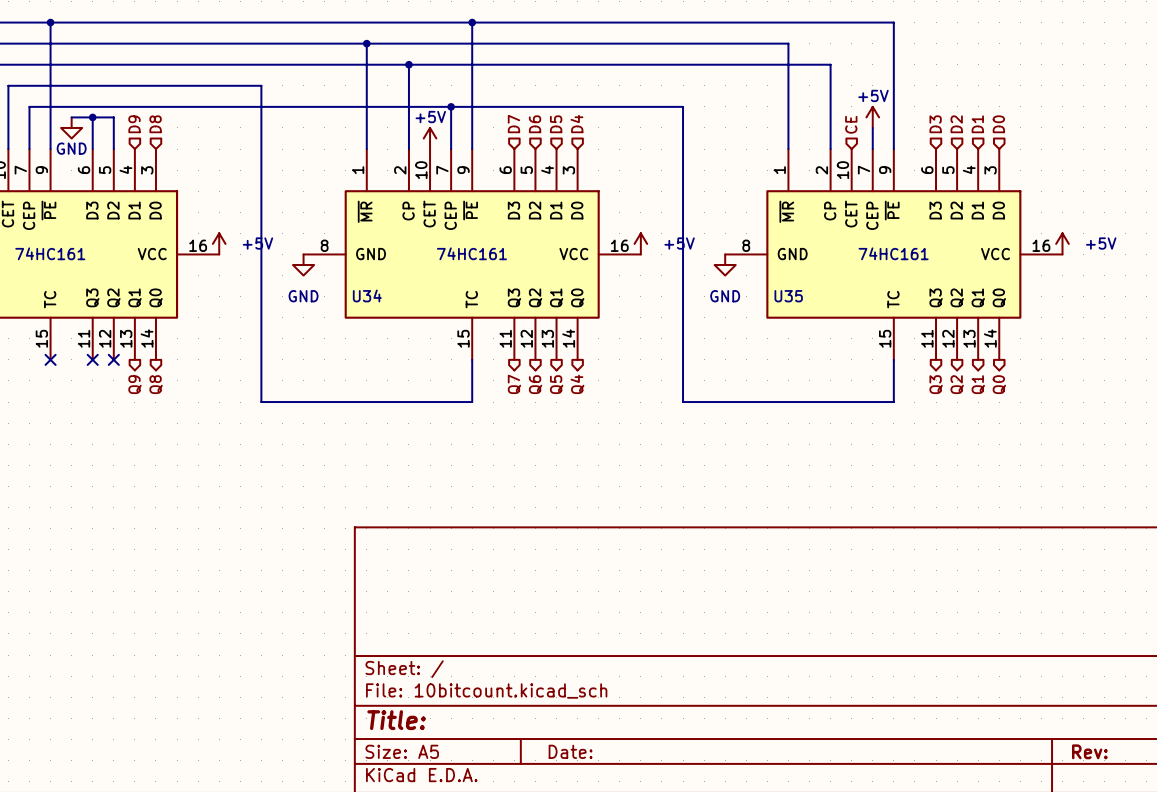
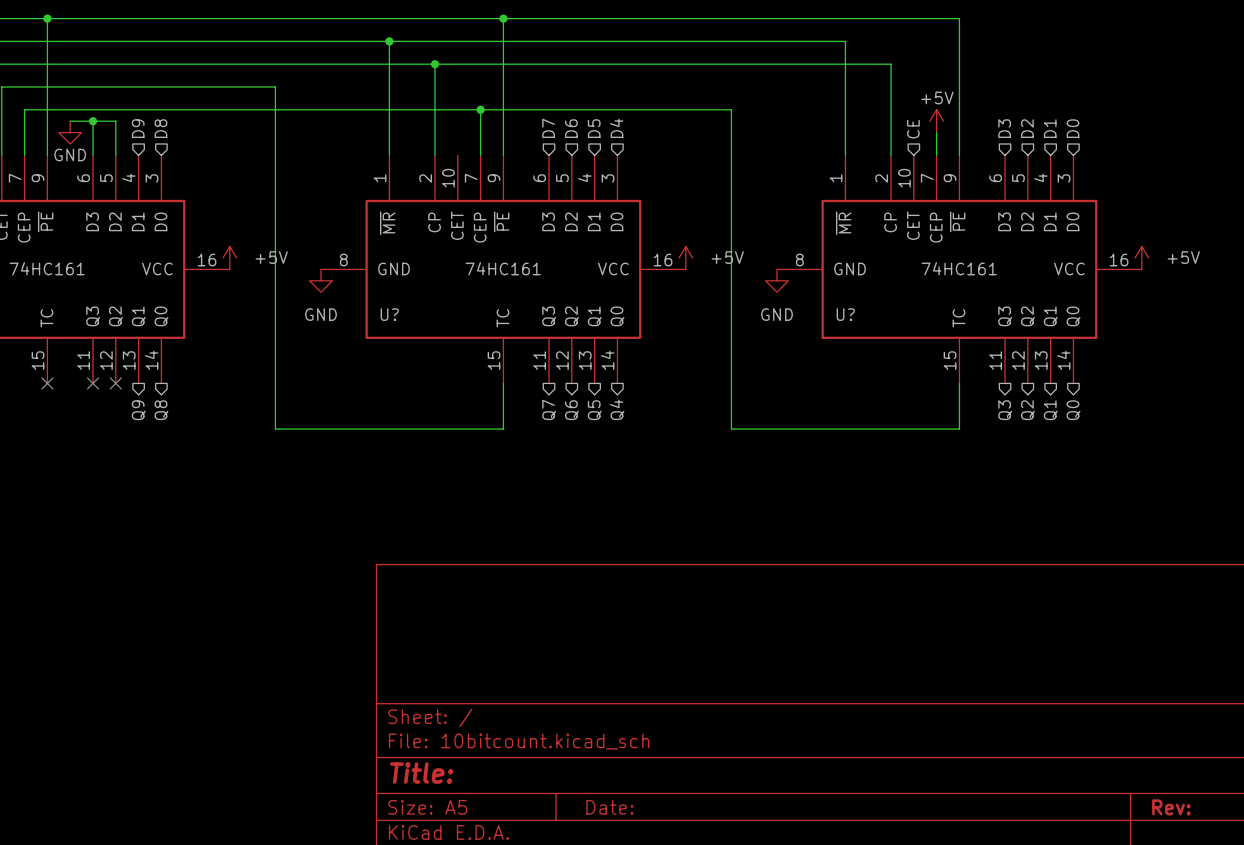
power symbol: +5V (430, 138) -> none
U34 name: U34 (367, 295) -> U? (389, 314)
U35 name: U35 (788, 296) -> U? (845, 314)

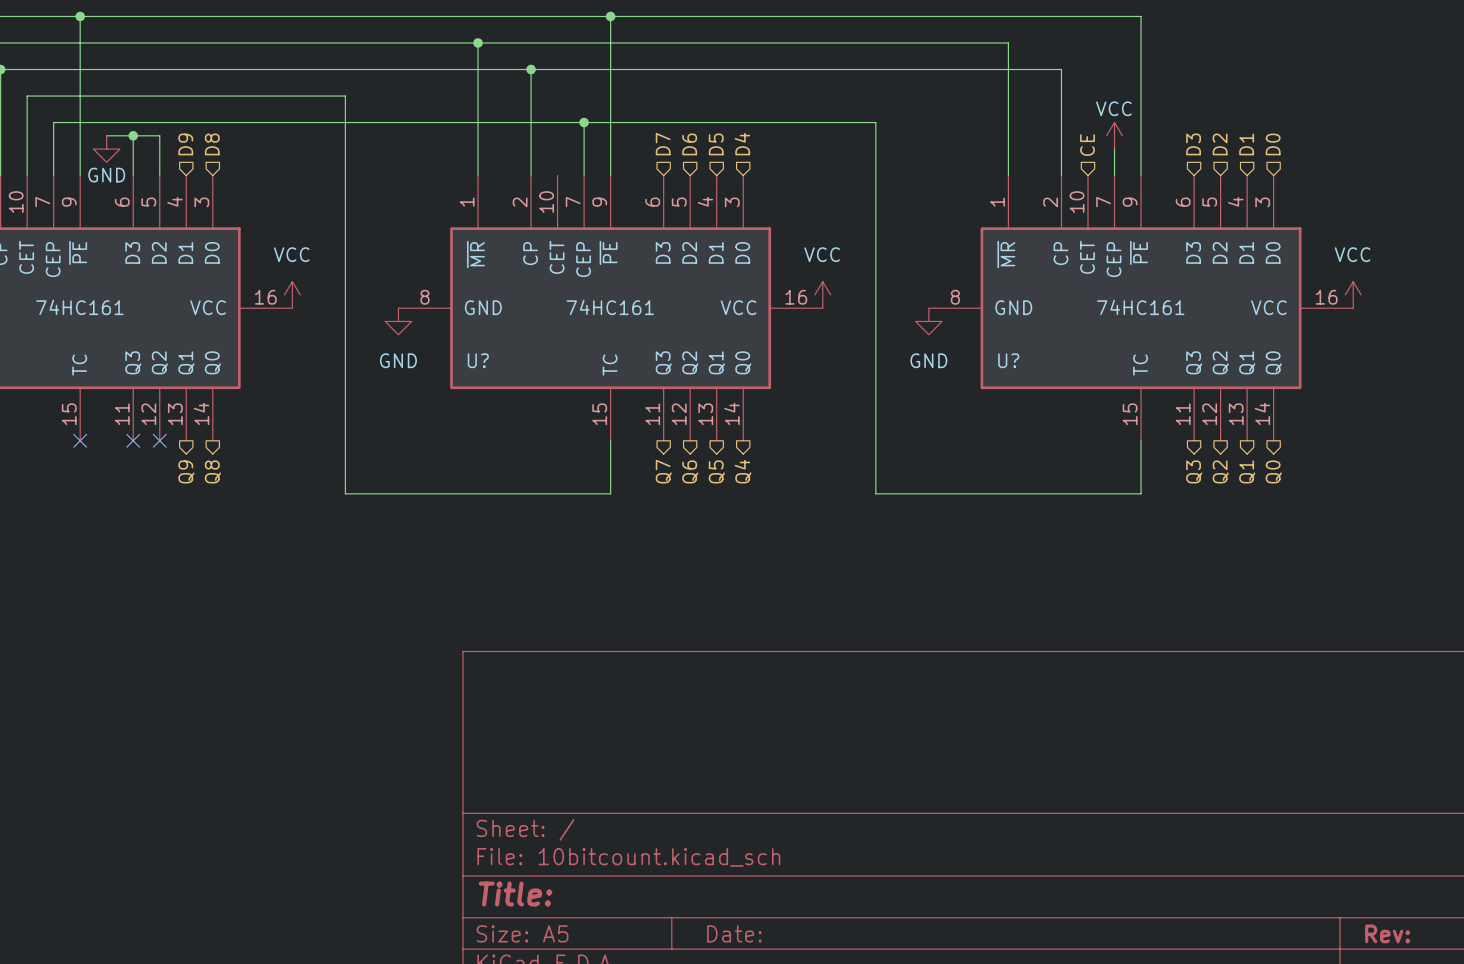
power symbol: +5V (936, 121) -> VCC (1114, 135)
power symbol: +5V (229, 258) -> VCC (292, 294)
power symbol: +5V (685, 258) -> VCC (822, 294)
power symbol: +5V (1141, 258) -> VCC (1353, 294)

